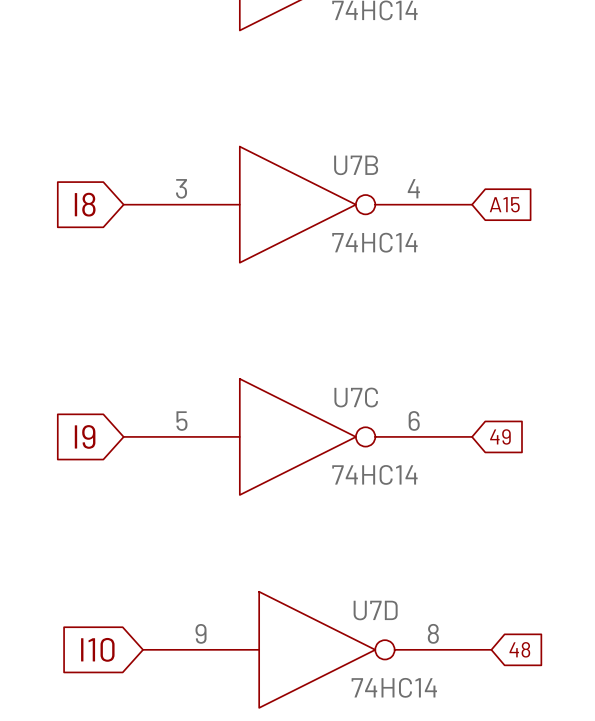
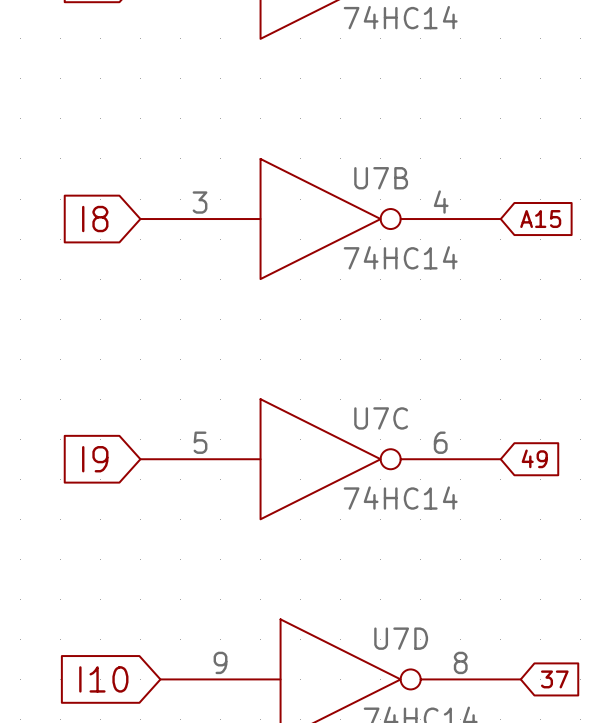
global label: 48 (519, 649) -> 37 (554, 679)

